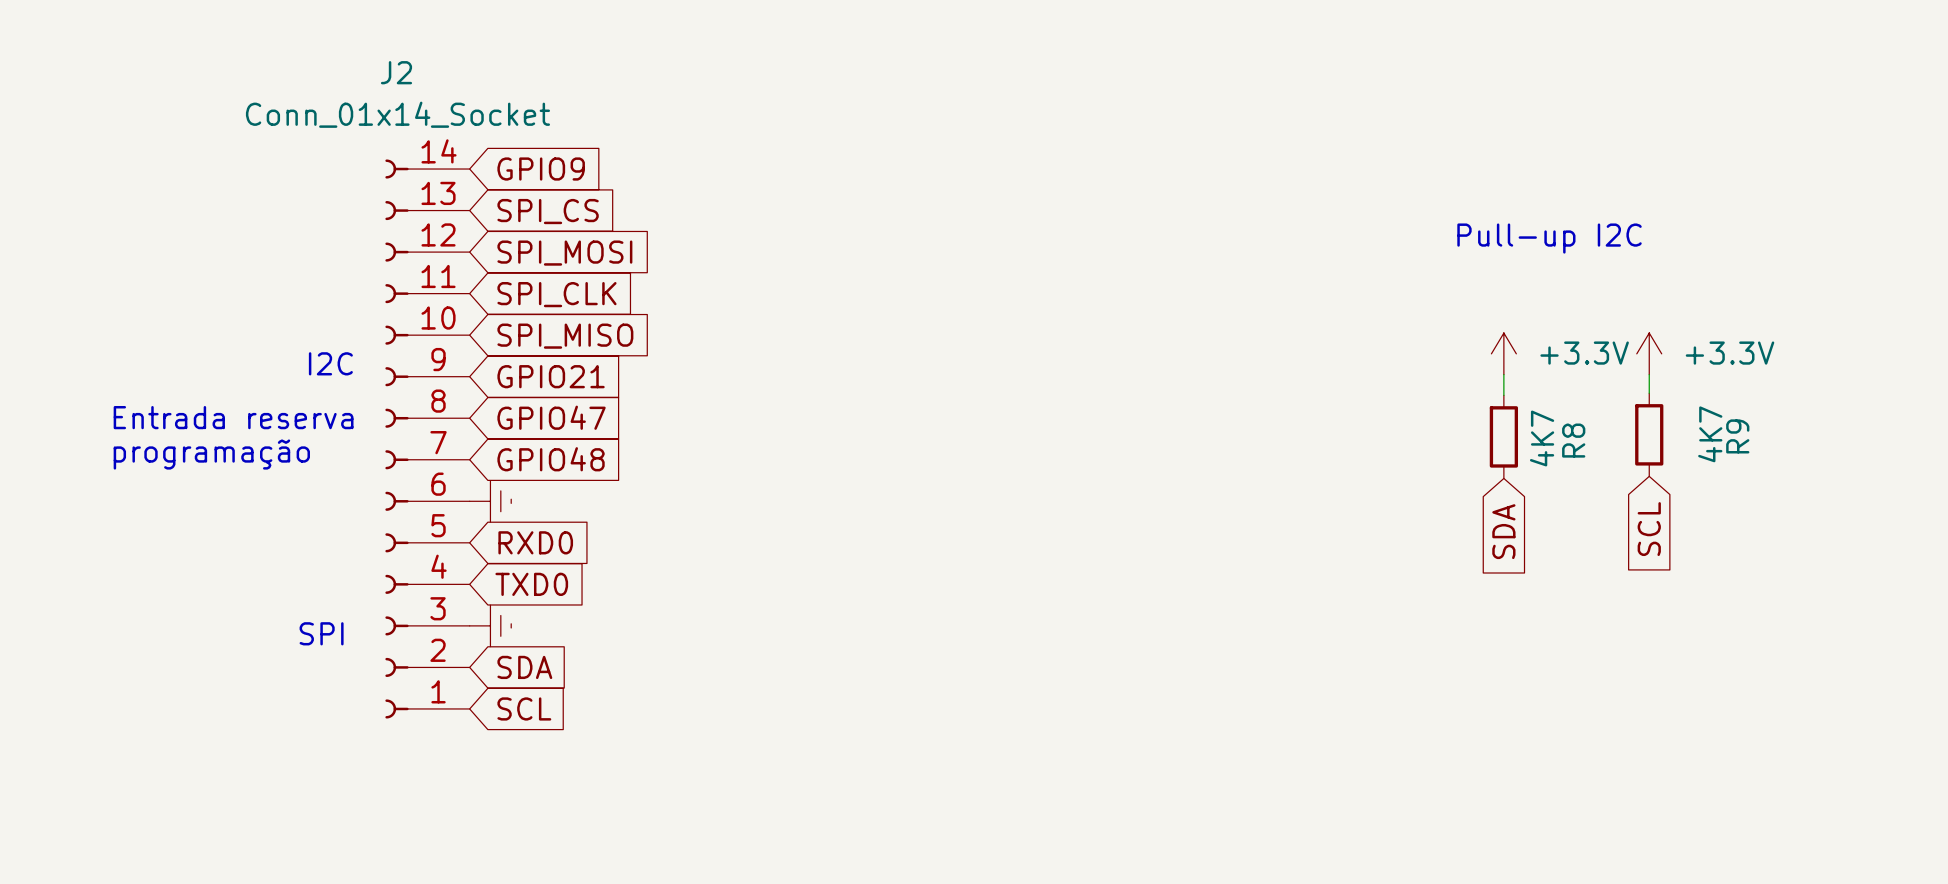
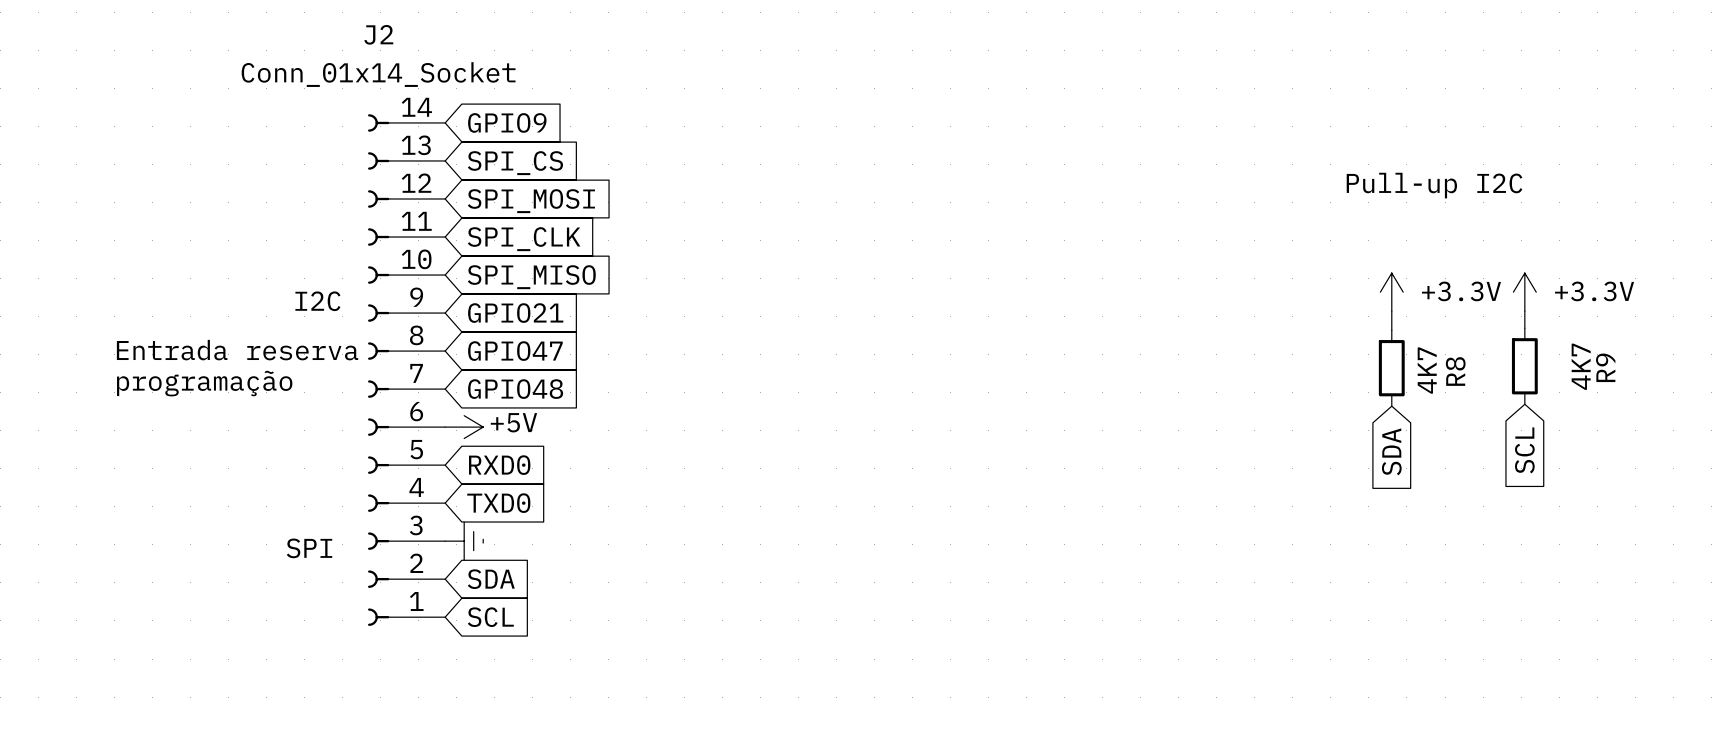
power symbol shape: [469, 480, 512, 523] -> [445, 415, 484, 439]
power symbol text: none -> +5V (513, 422)

